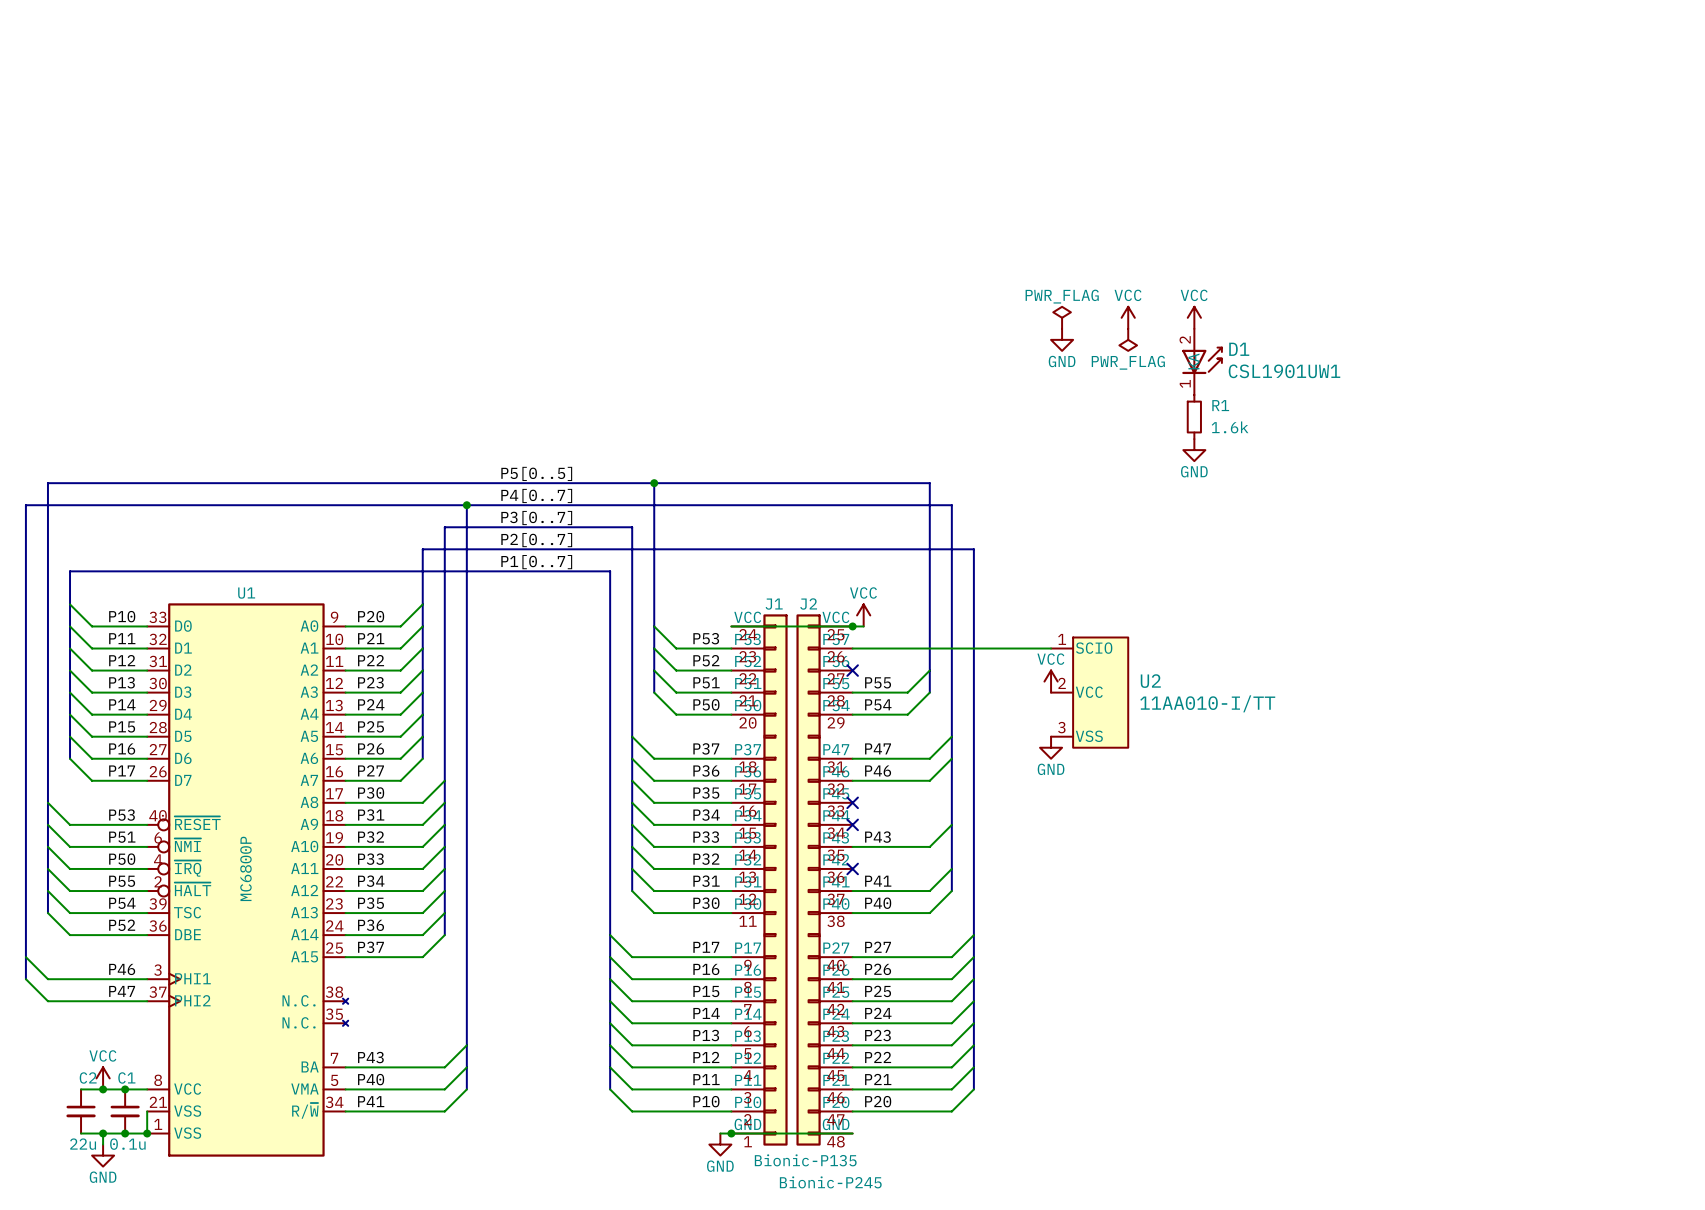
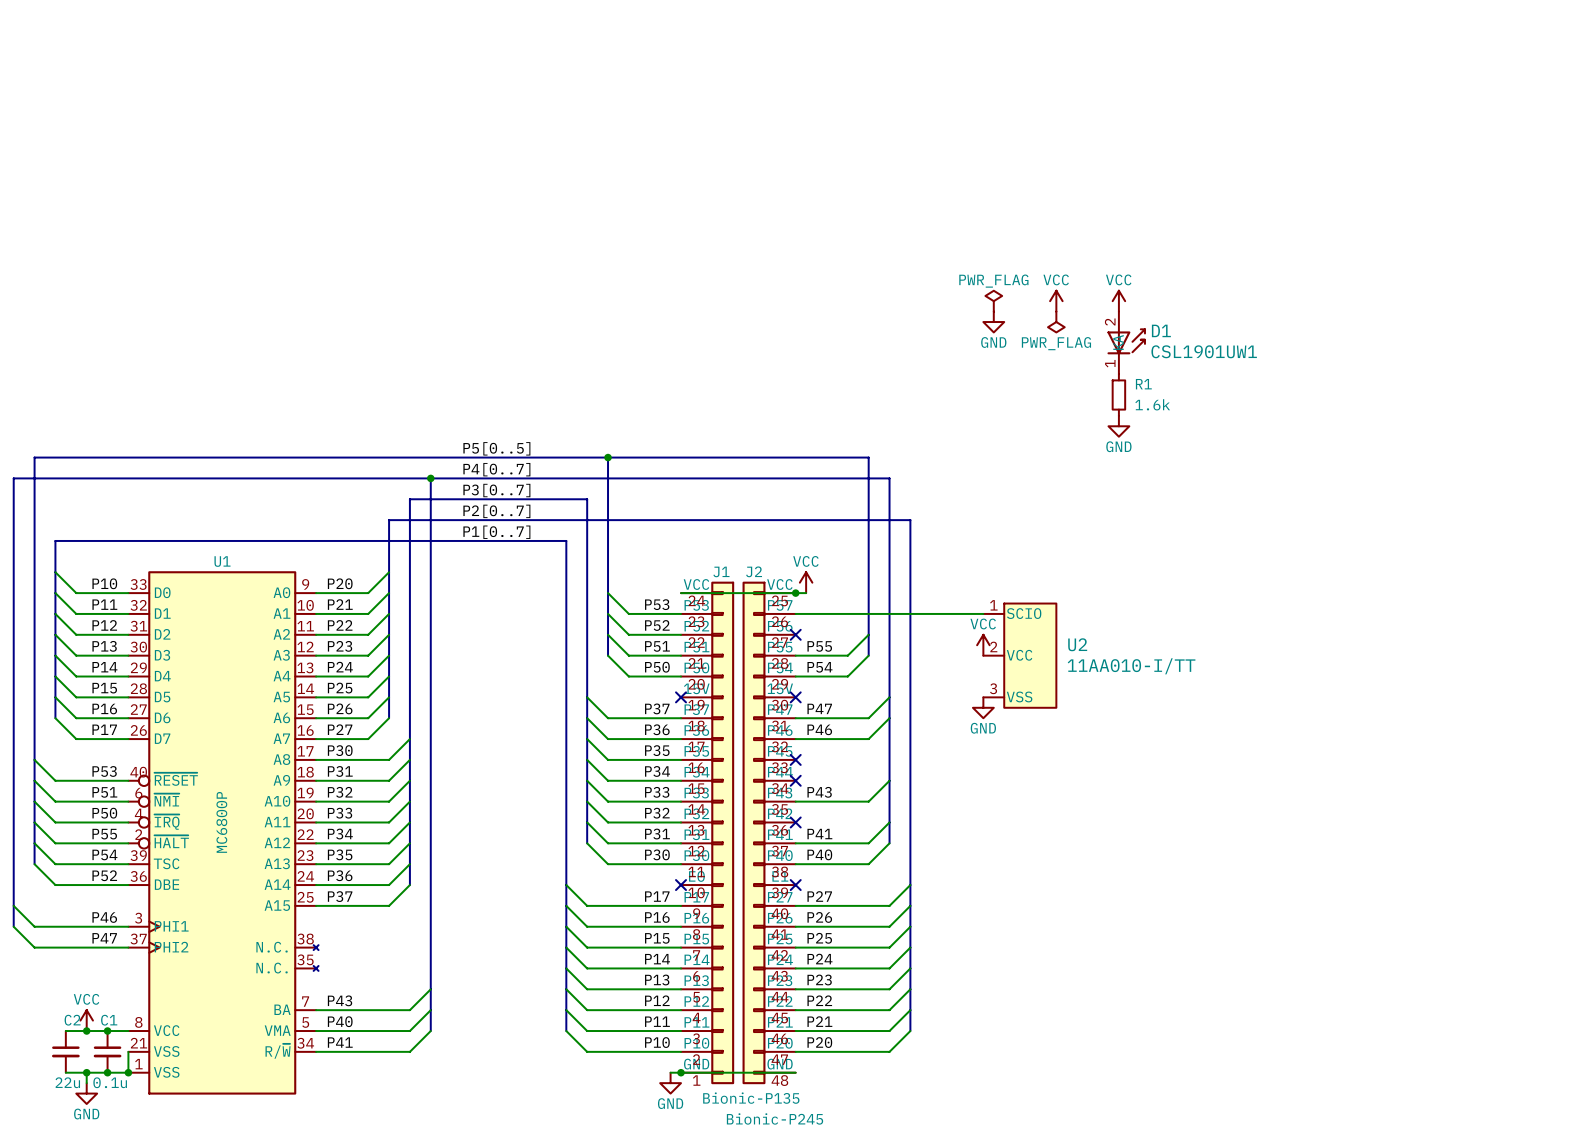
J1 symbol: [731, 614, 788, 1146] -> [681, 581, 735, 1085]
J2 symbol: [796, 614, 853, 1146] -> [742, 581, 796, 1085]
no-connect mark: none -> (681, 697)
no-connect mark: none -> (795, 697)
no-connect mark: none -> (681, 885)
no-connect mark: none -> (795, 885)

